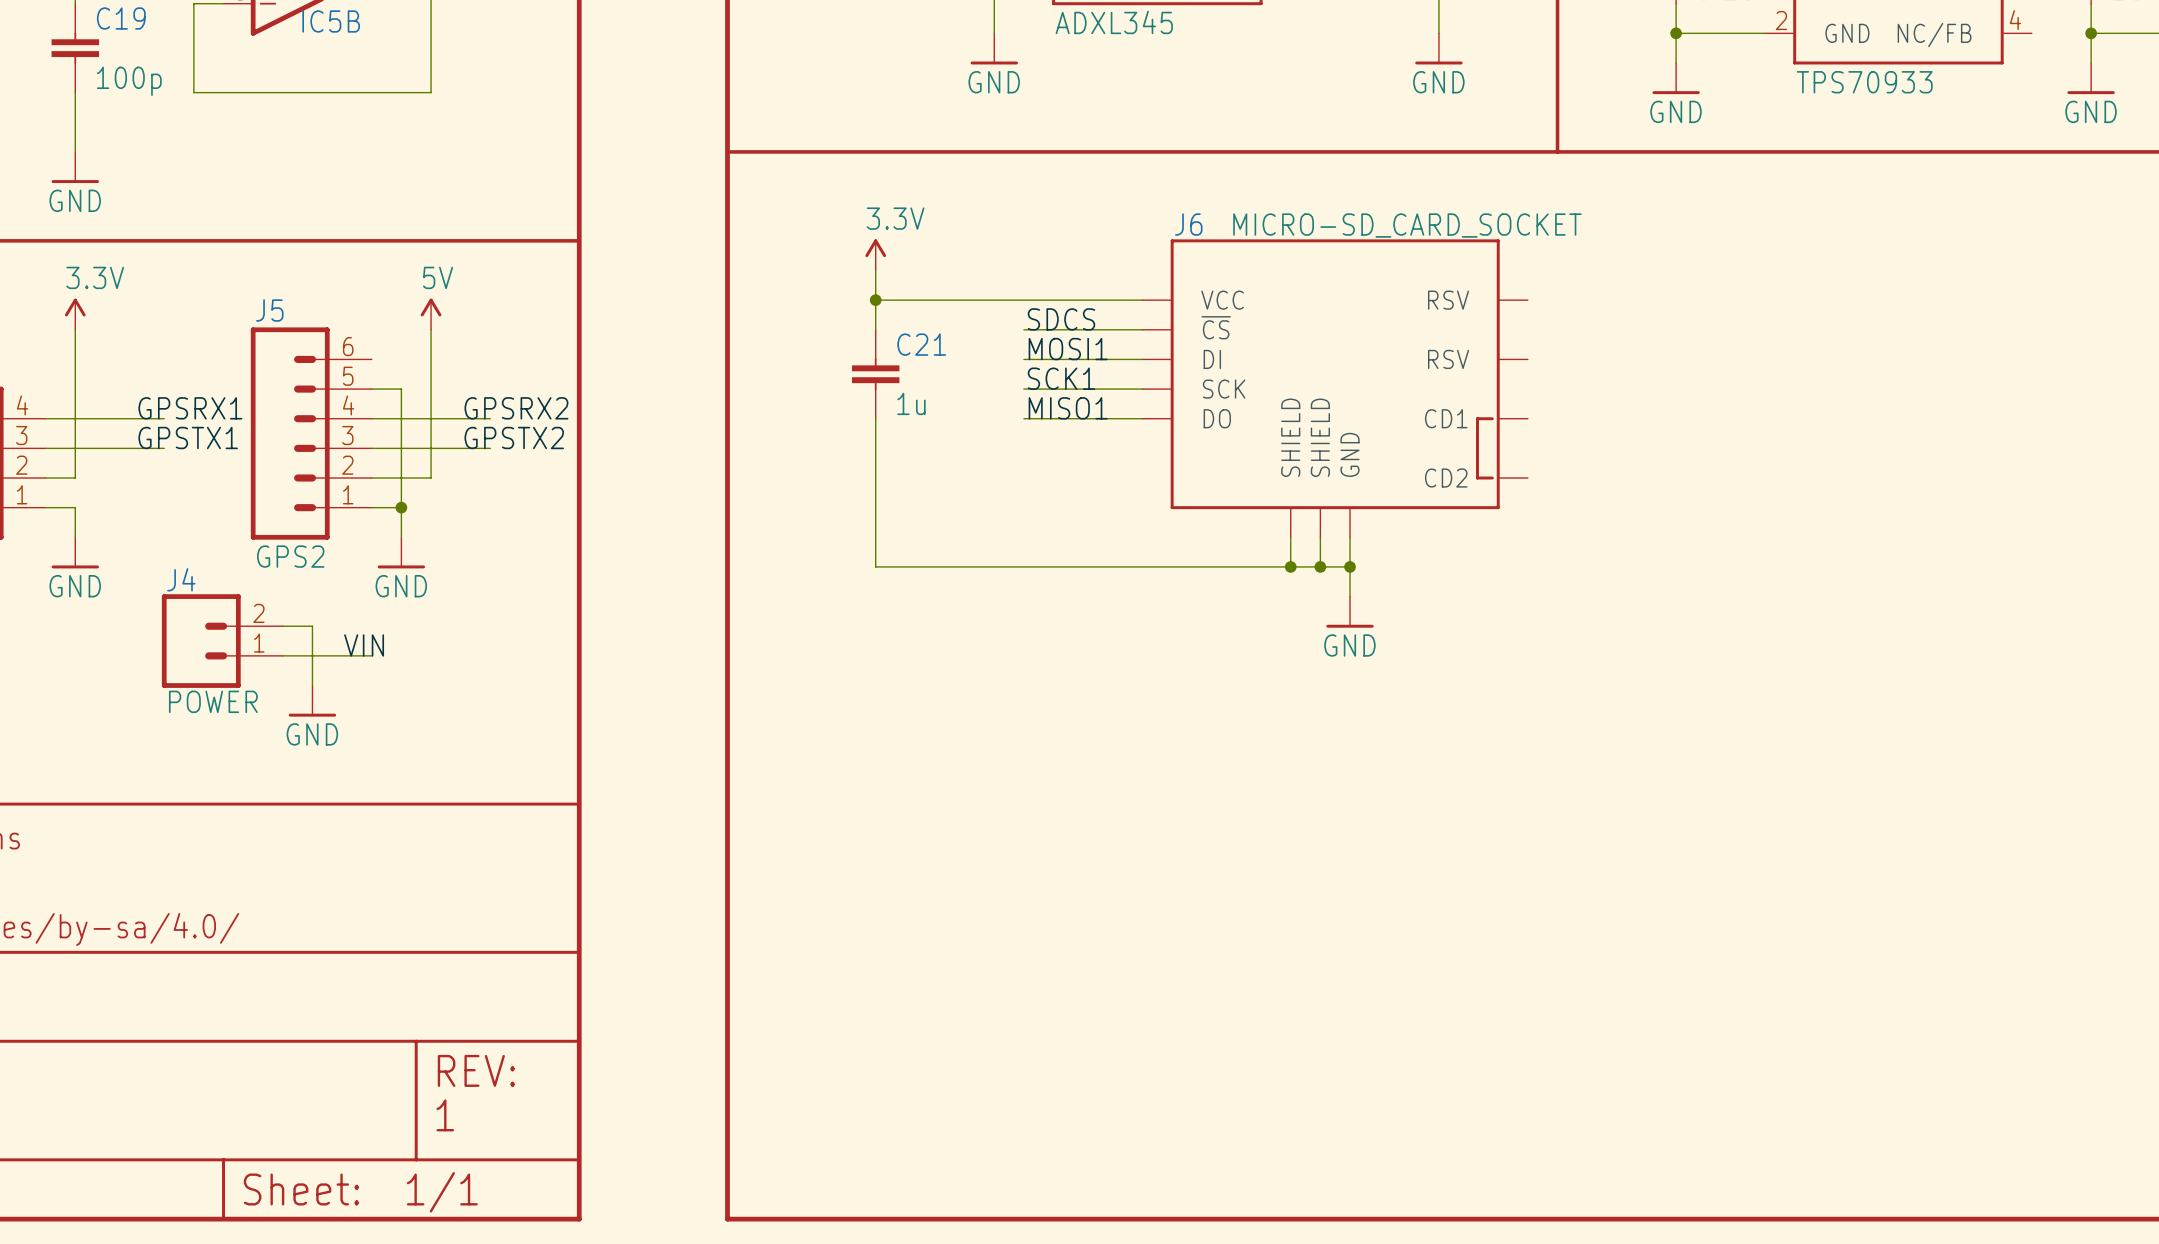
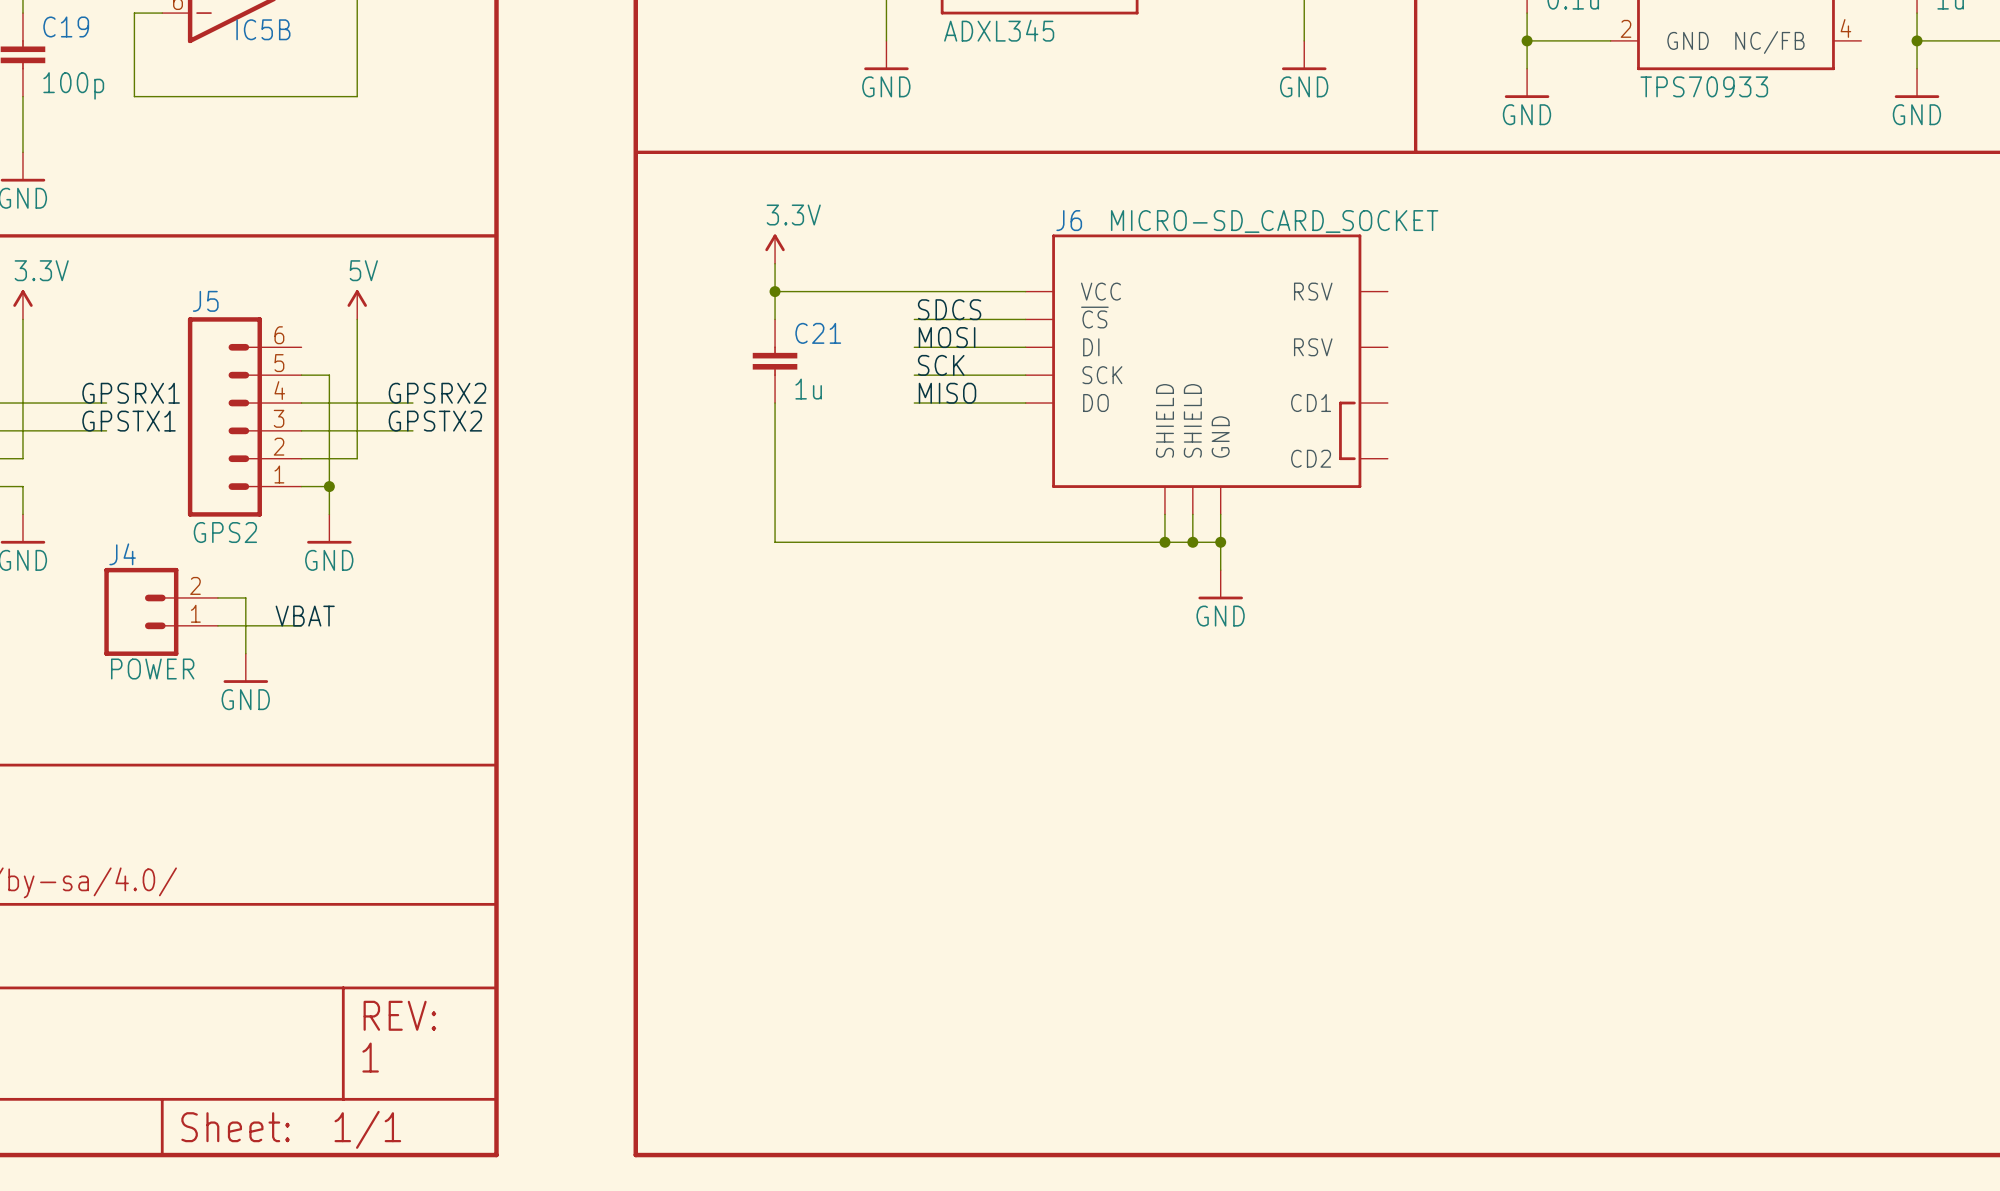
label: MOSI1 (1068, 349) -> MOSI (947, 337)
label: SCK1 (1061, 378) -> SCK (941, 365)
label: MISO1 (1068, 408) -> MISO (947, 393)
label: VIN (364, 645) -> VBAT (305, 616)

